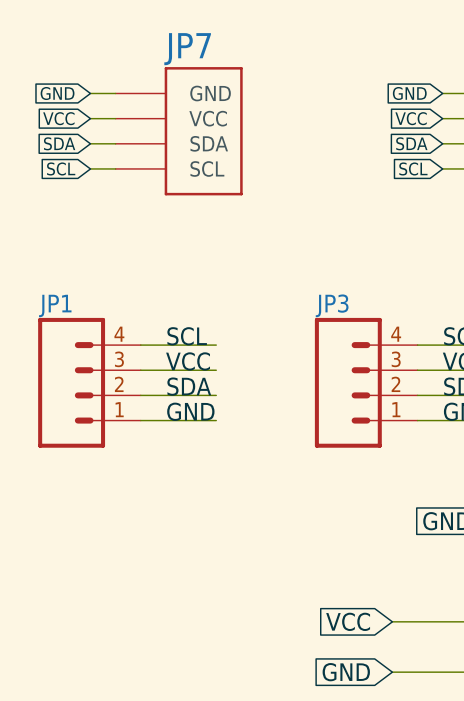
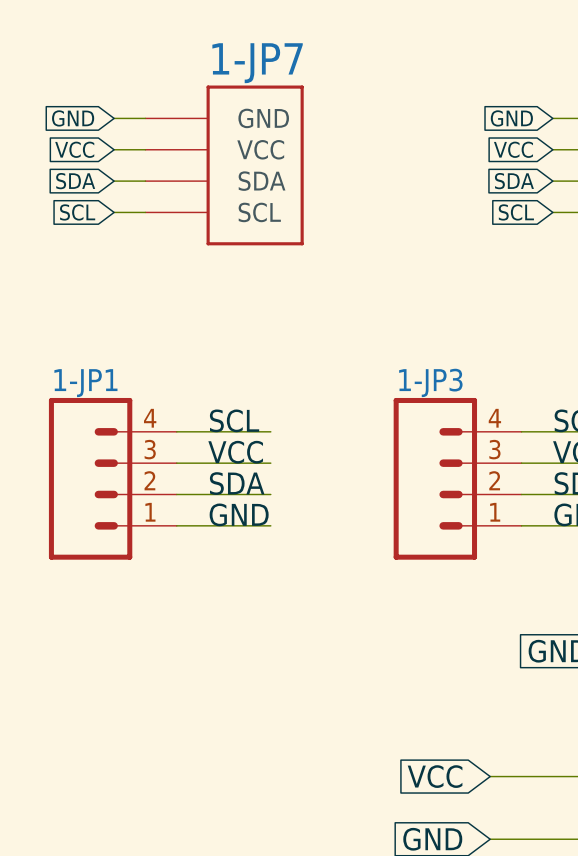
JP7 name: JP7 (187, 49) -> 1-JP7 (257, 63)
JP1 name: JP1 (55, 305) -> 1-JP1 (85, 383)
JP3 name: JP3 (332, 305) -> 1-JP3 (430, 382)

